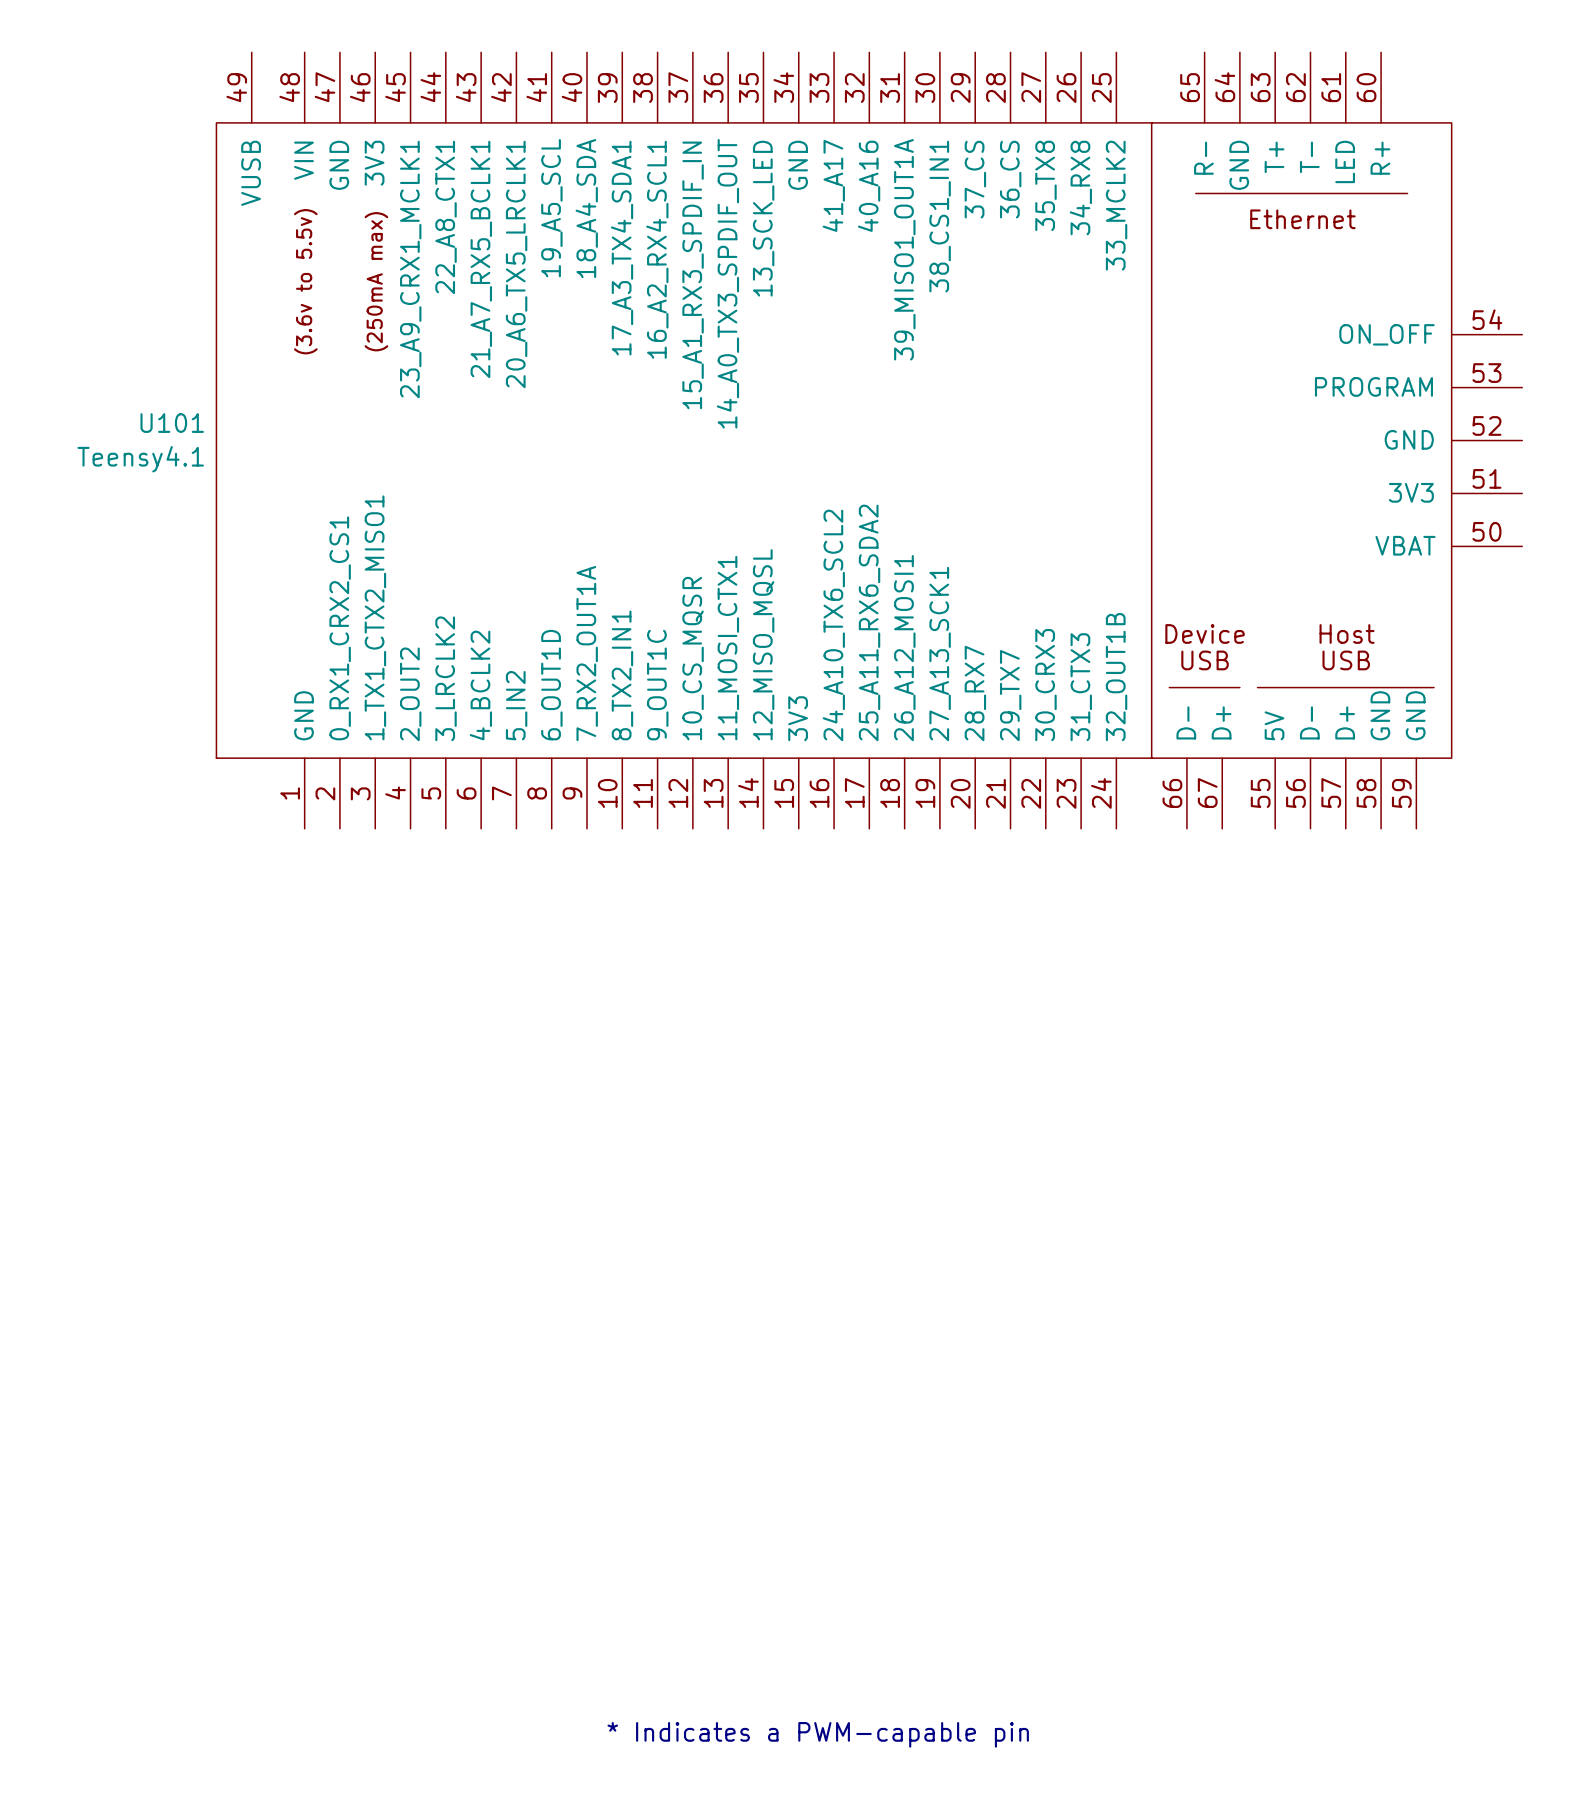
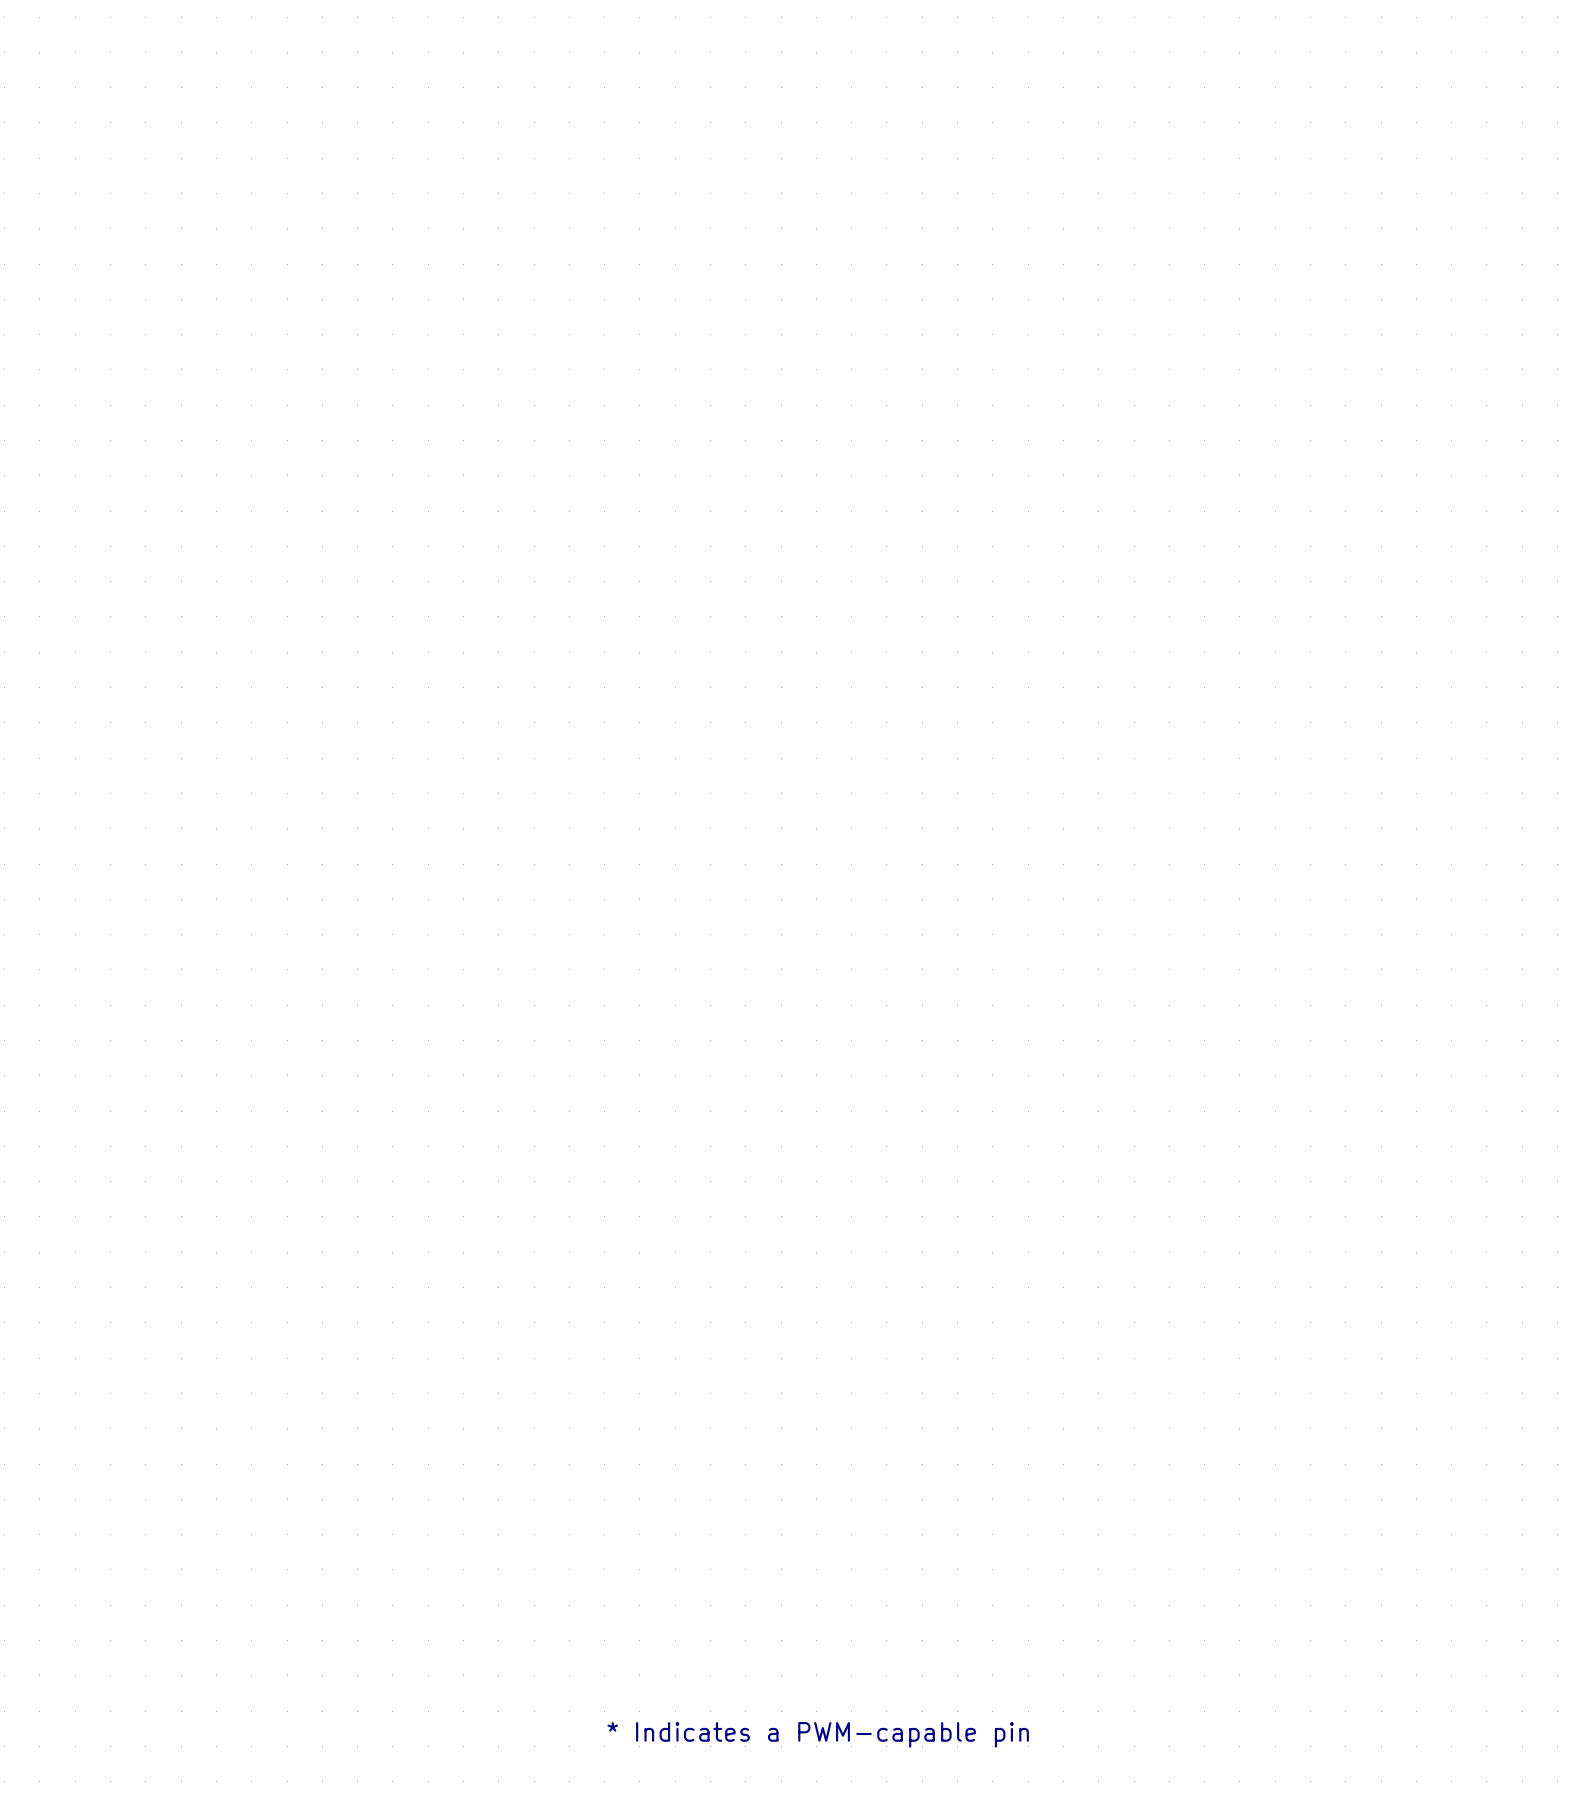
U101: Teensy4.1 (869, 440) -> none

